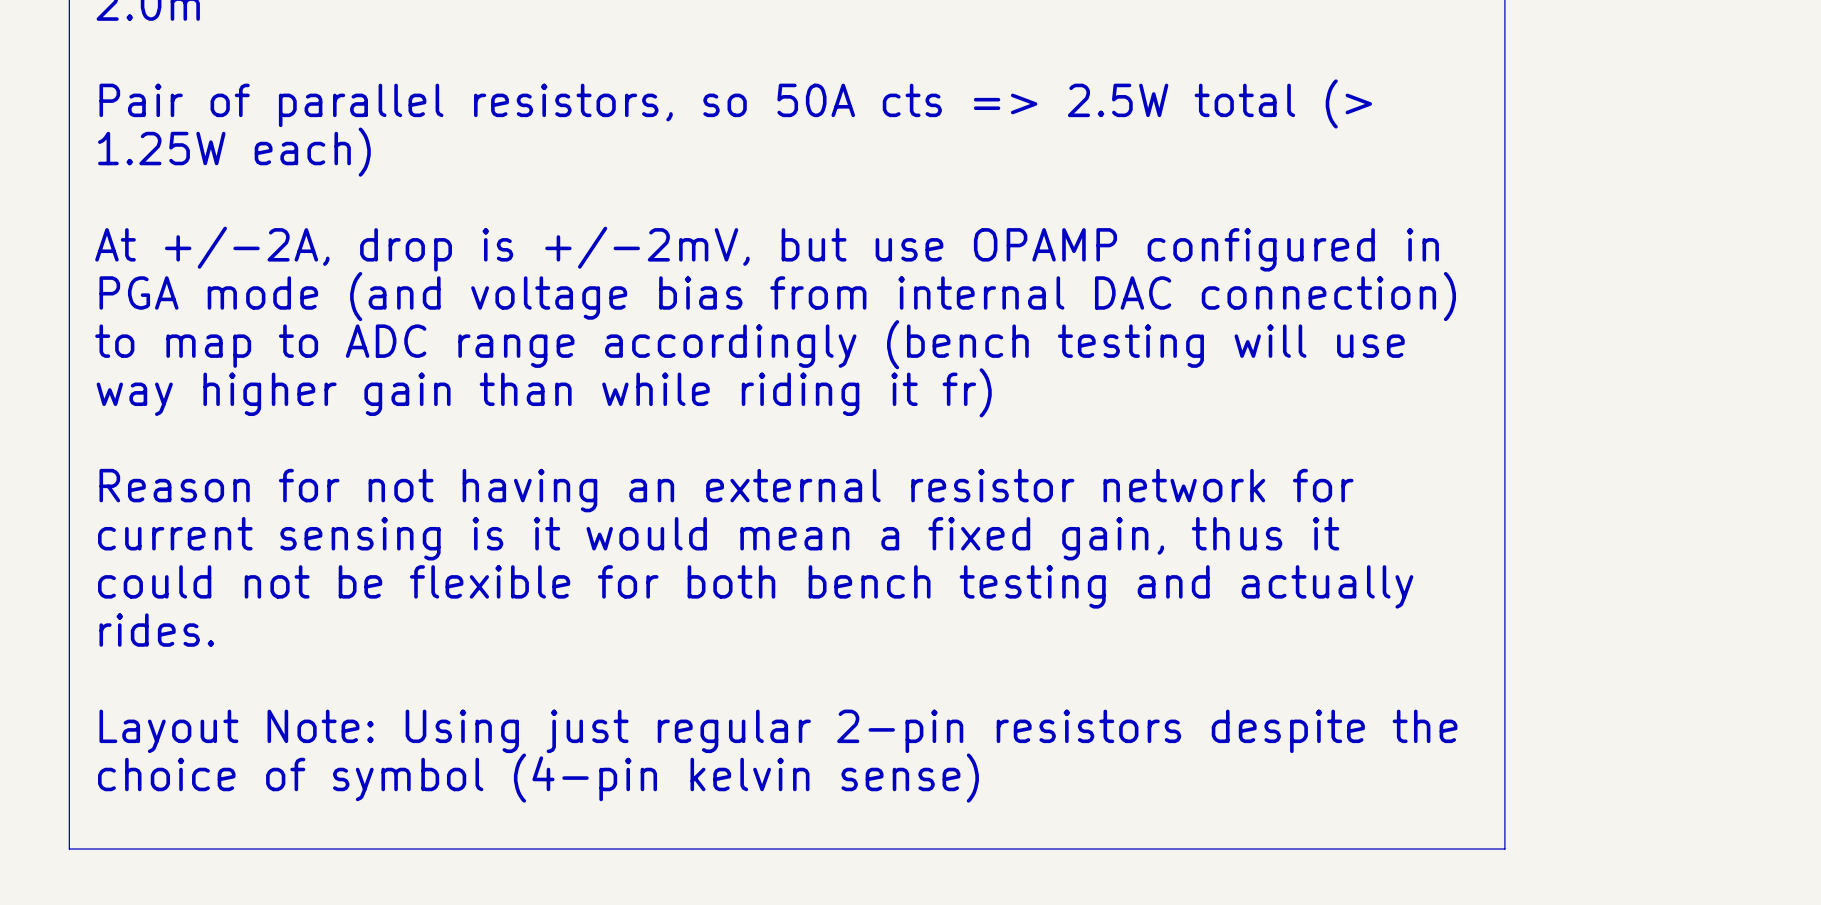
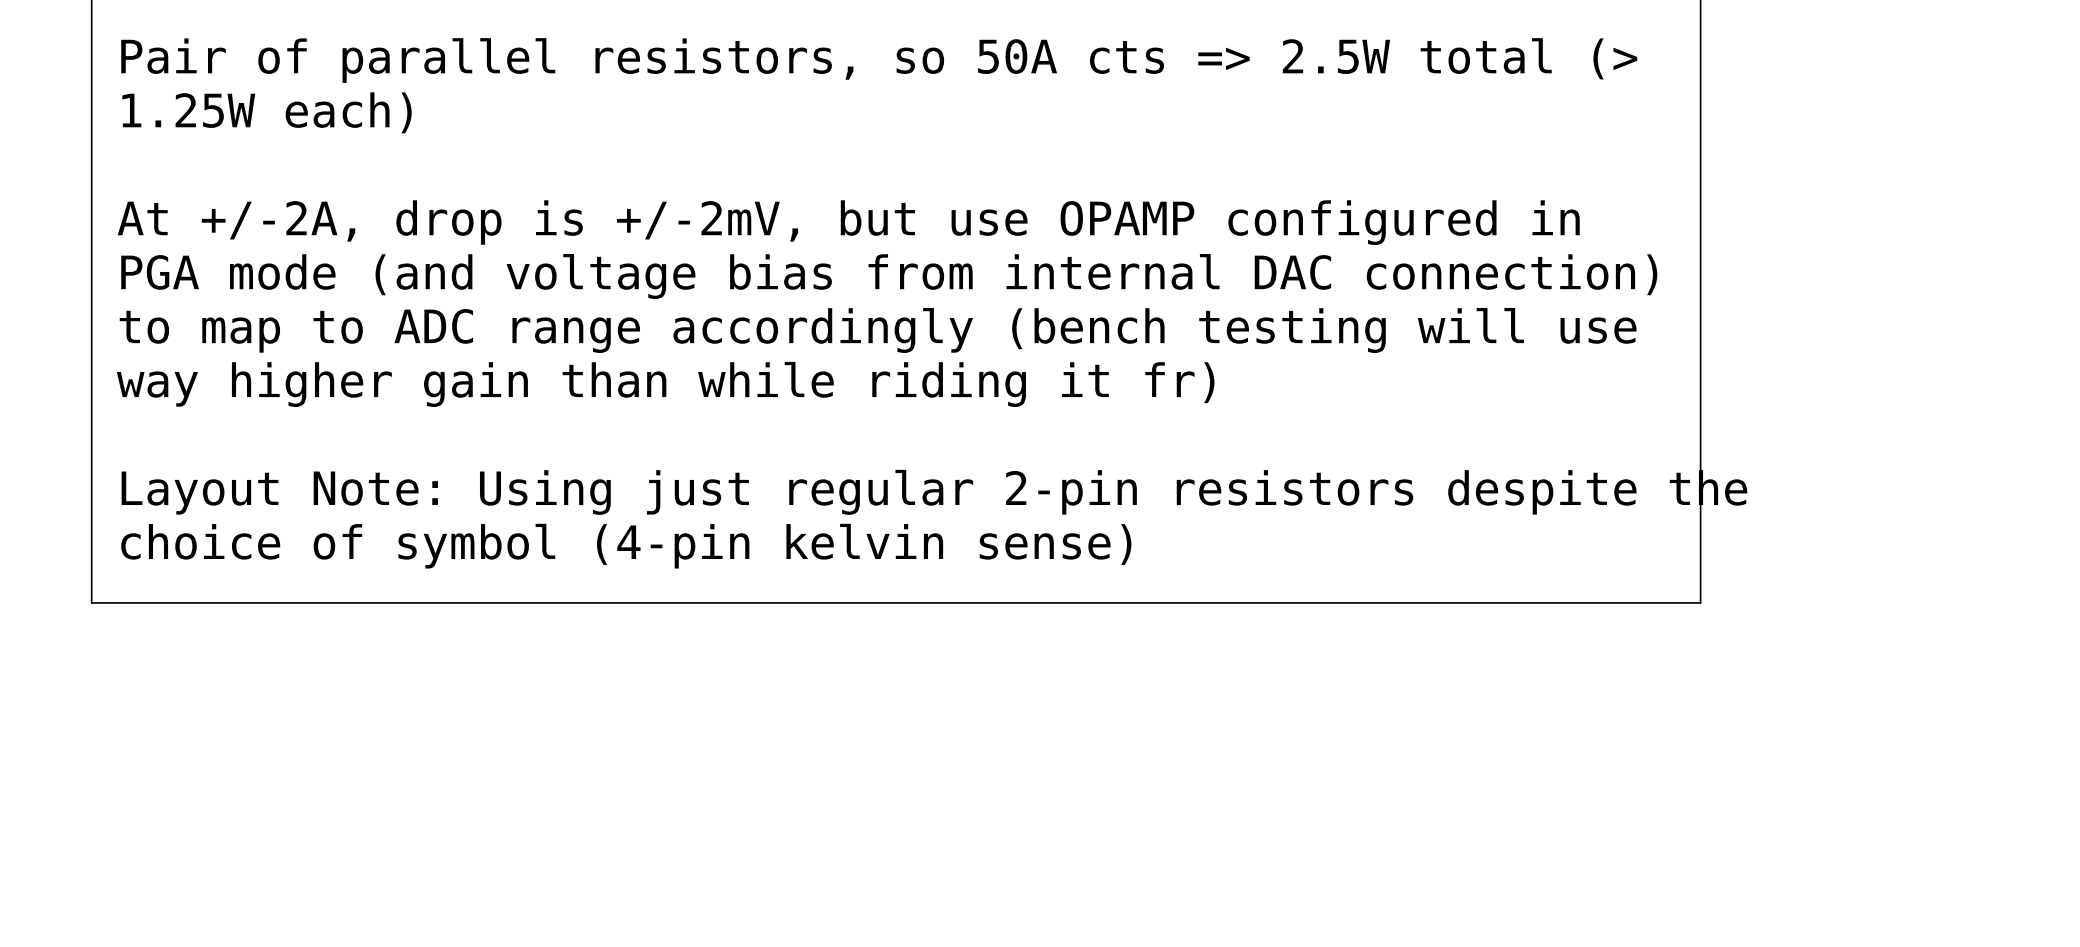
text: Reason for not having an external resistor network for (726, 490) -> Layout Note: Using just regular 2-pin resistors despite the (934, 492)
text: current sensing is it would mean a fixed gain, thus it (718, 538) -> choice of symbol (4-pin kelvin sense) (626, 546)
text: could not be flexible for both bench testing and actually (755, 586) -> none
line: (69, 587) (69, 849) (1504, 849) (1504, 587) -> (91, 602) (1700, 602)
text: rides. (156, 630) -> none
text: Layout Note: Using just regular 2-pin resistors despite the (778, 731) -> none
text: choice of symbol (4-pin kelvin sense) (538, 778) -> none

